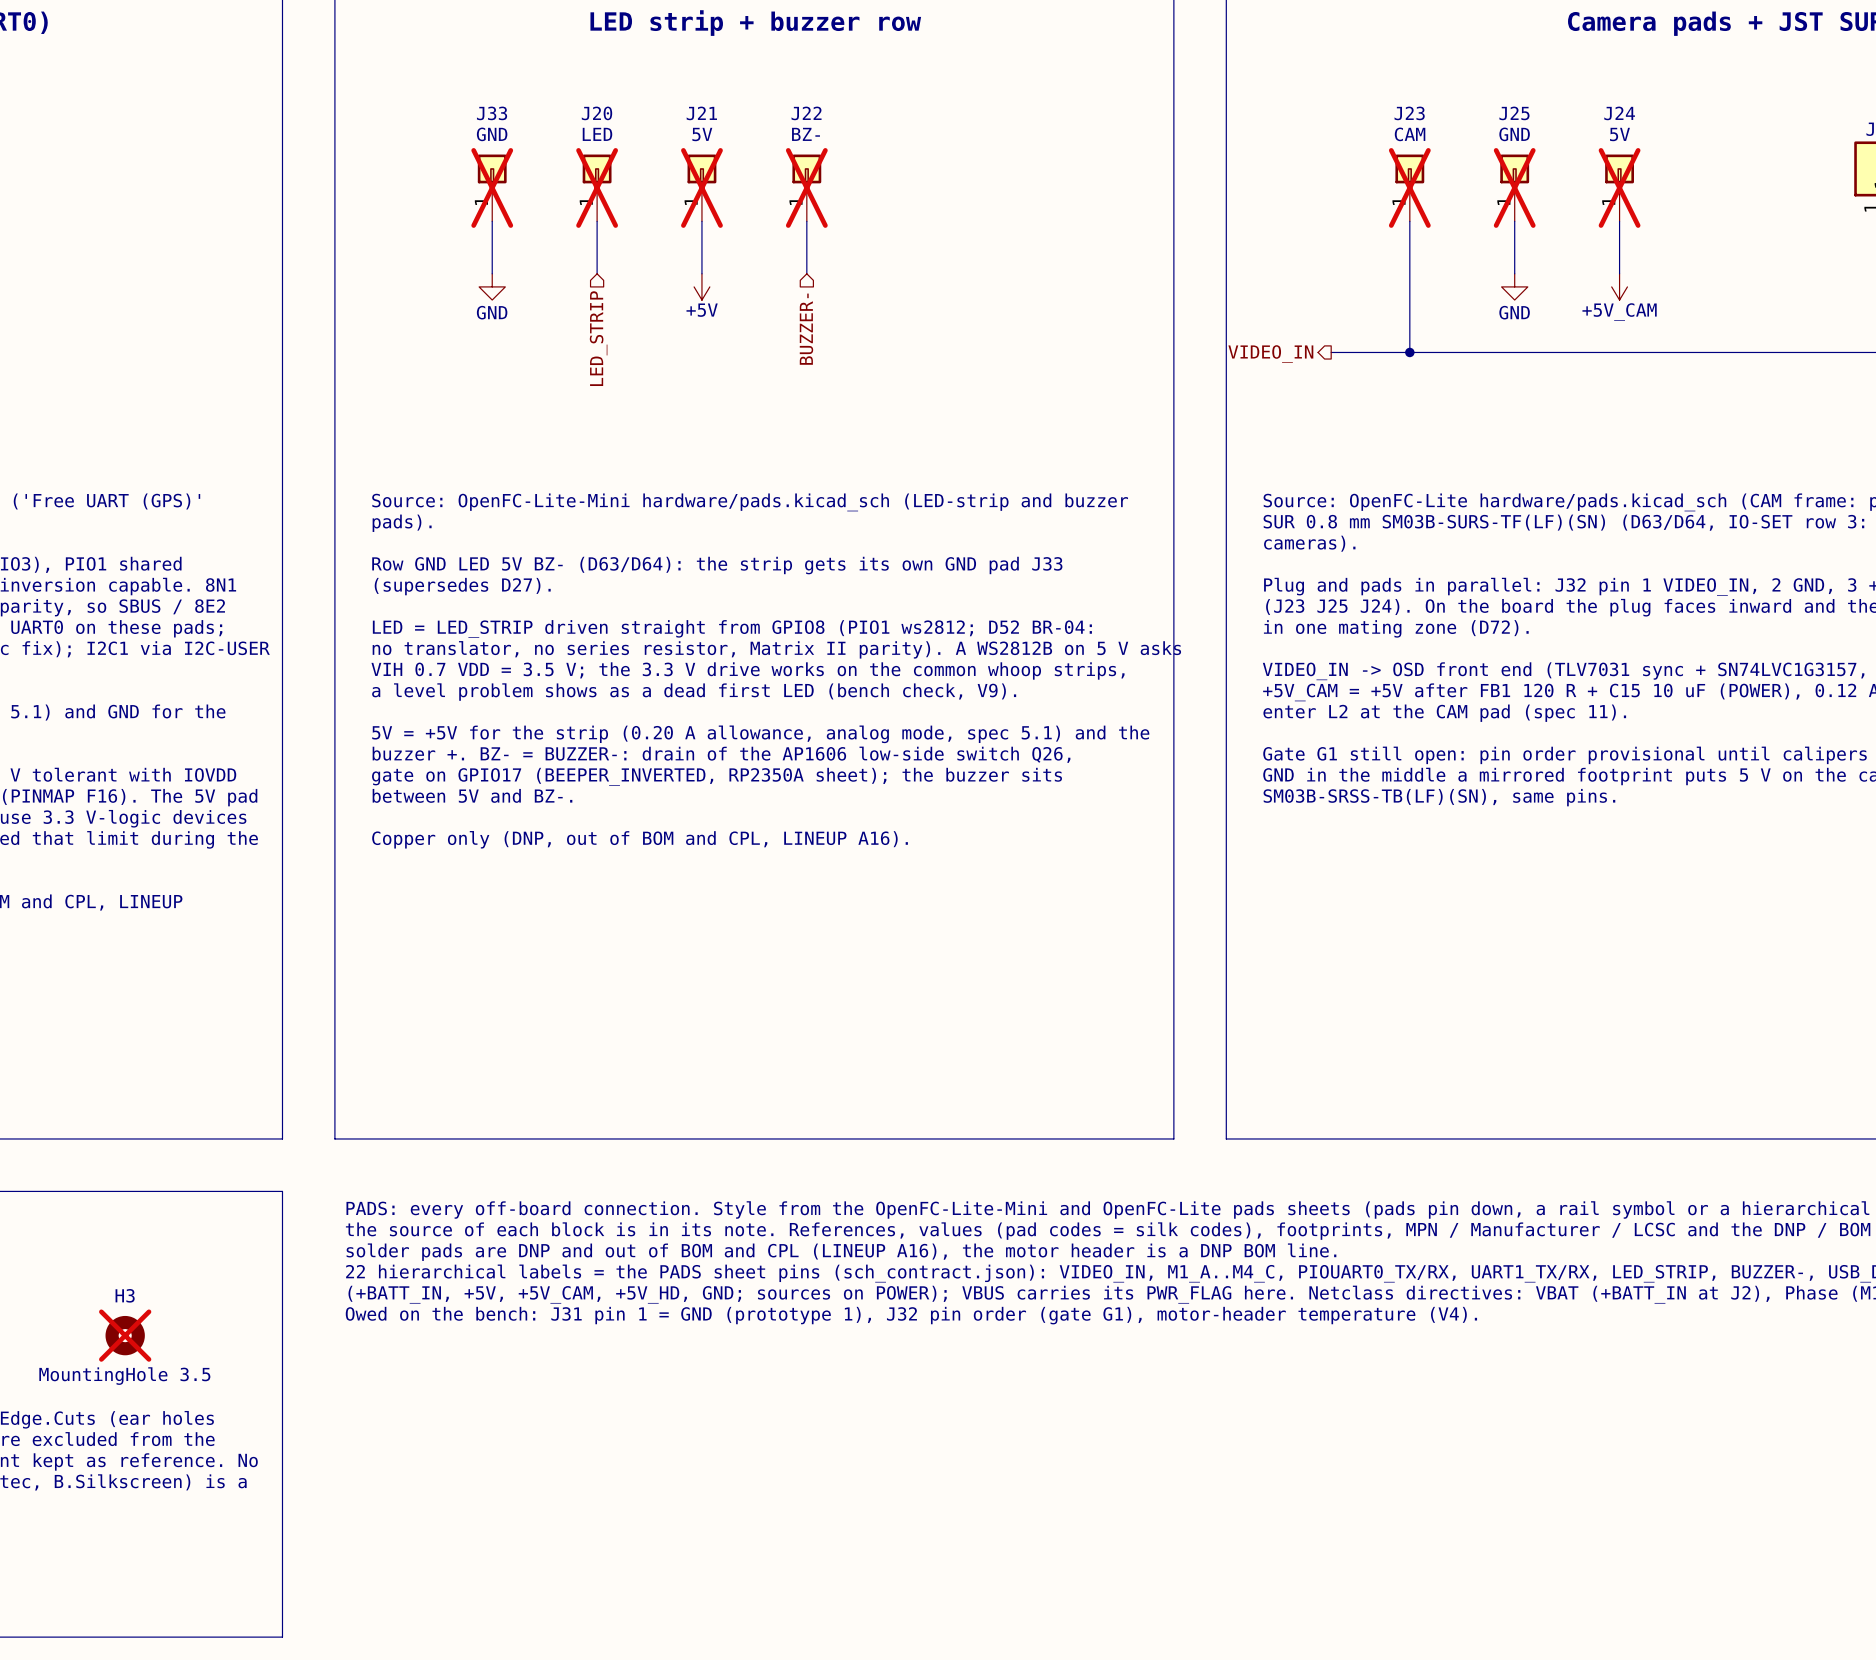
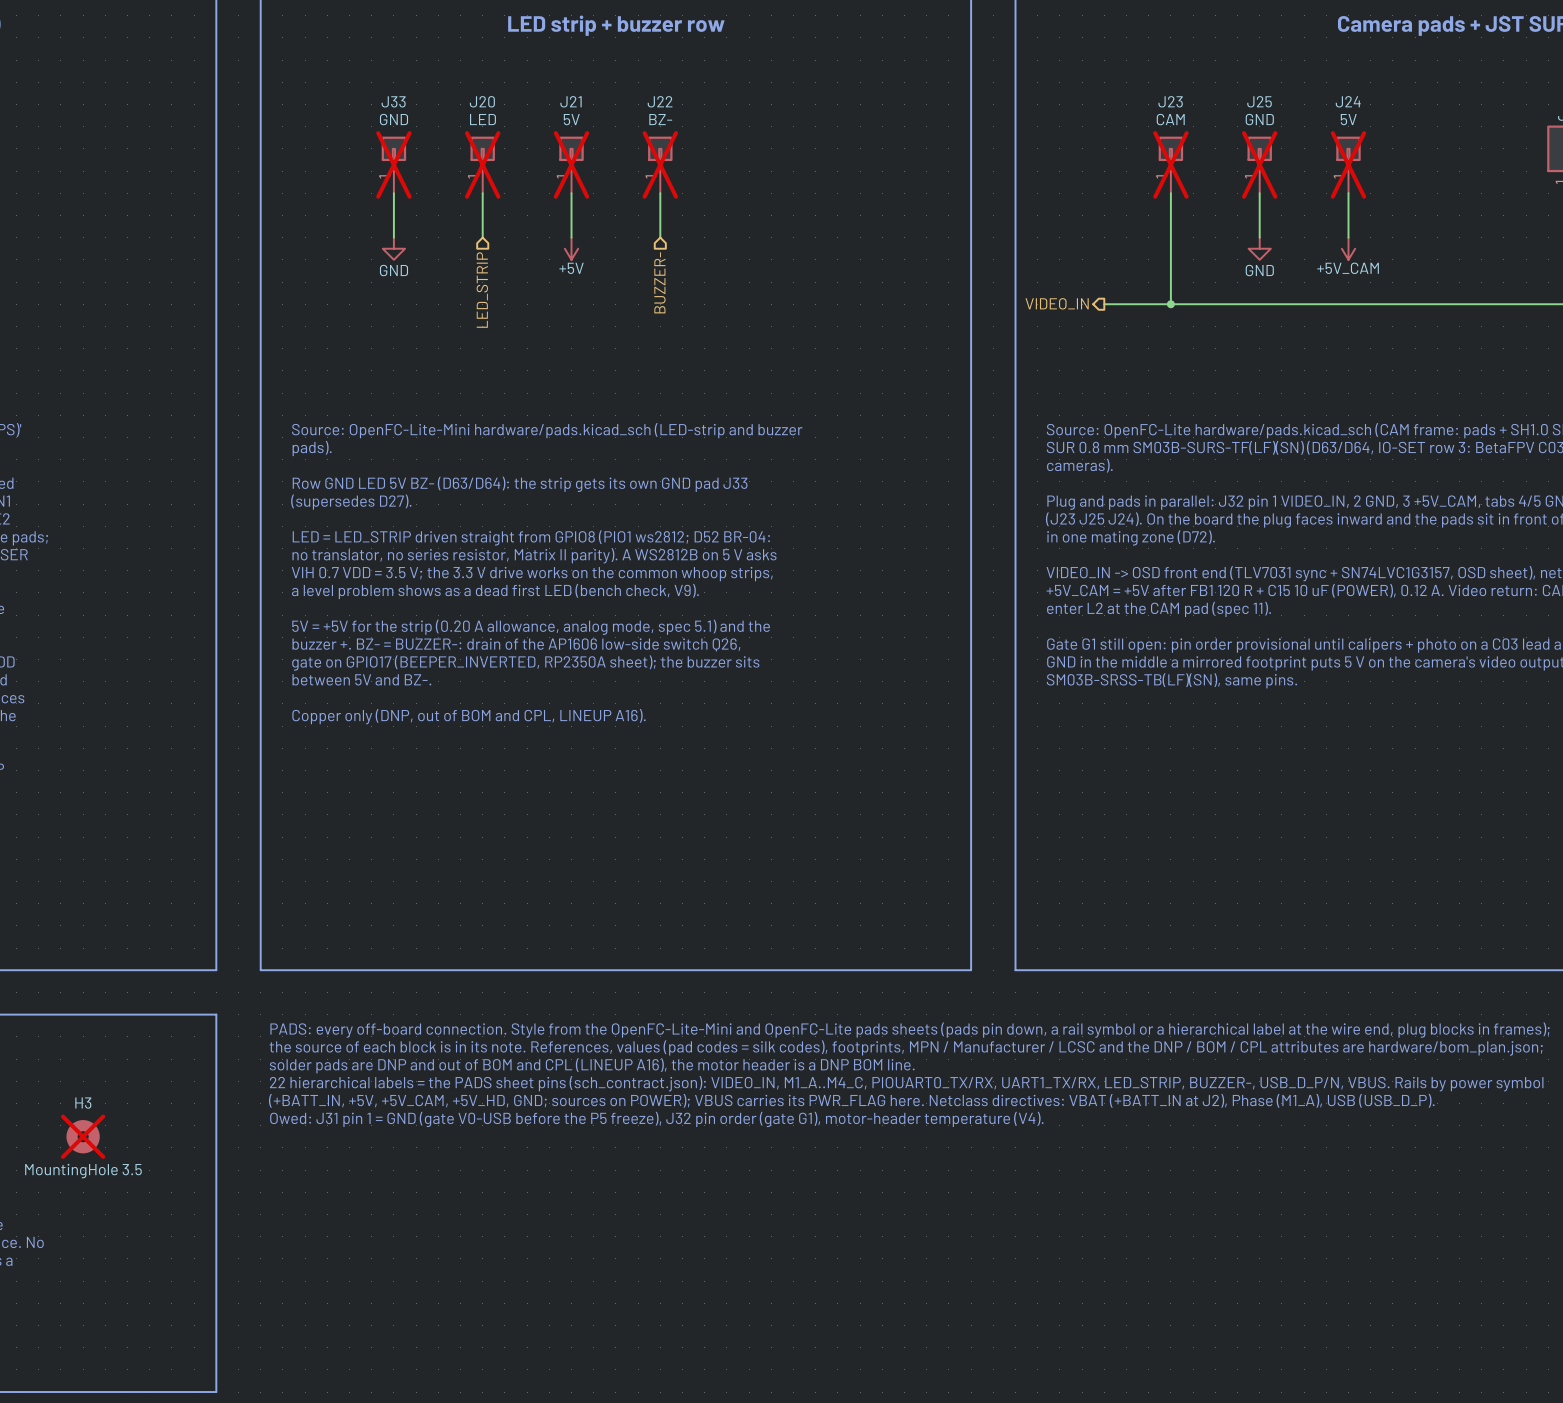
text: Owed on the bench: J31 pin 1 = GND (prototype 1), J32 pin order (gate G1), motor-header temperature (V4). (911, 1315) -> Owed: J31 pin 1 = GND (gate V0-USB before the P5 freeze), J32 pin order (gate G1), motor-header temperature (V4). (656, 1119)

